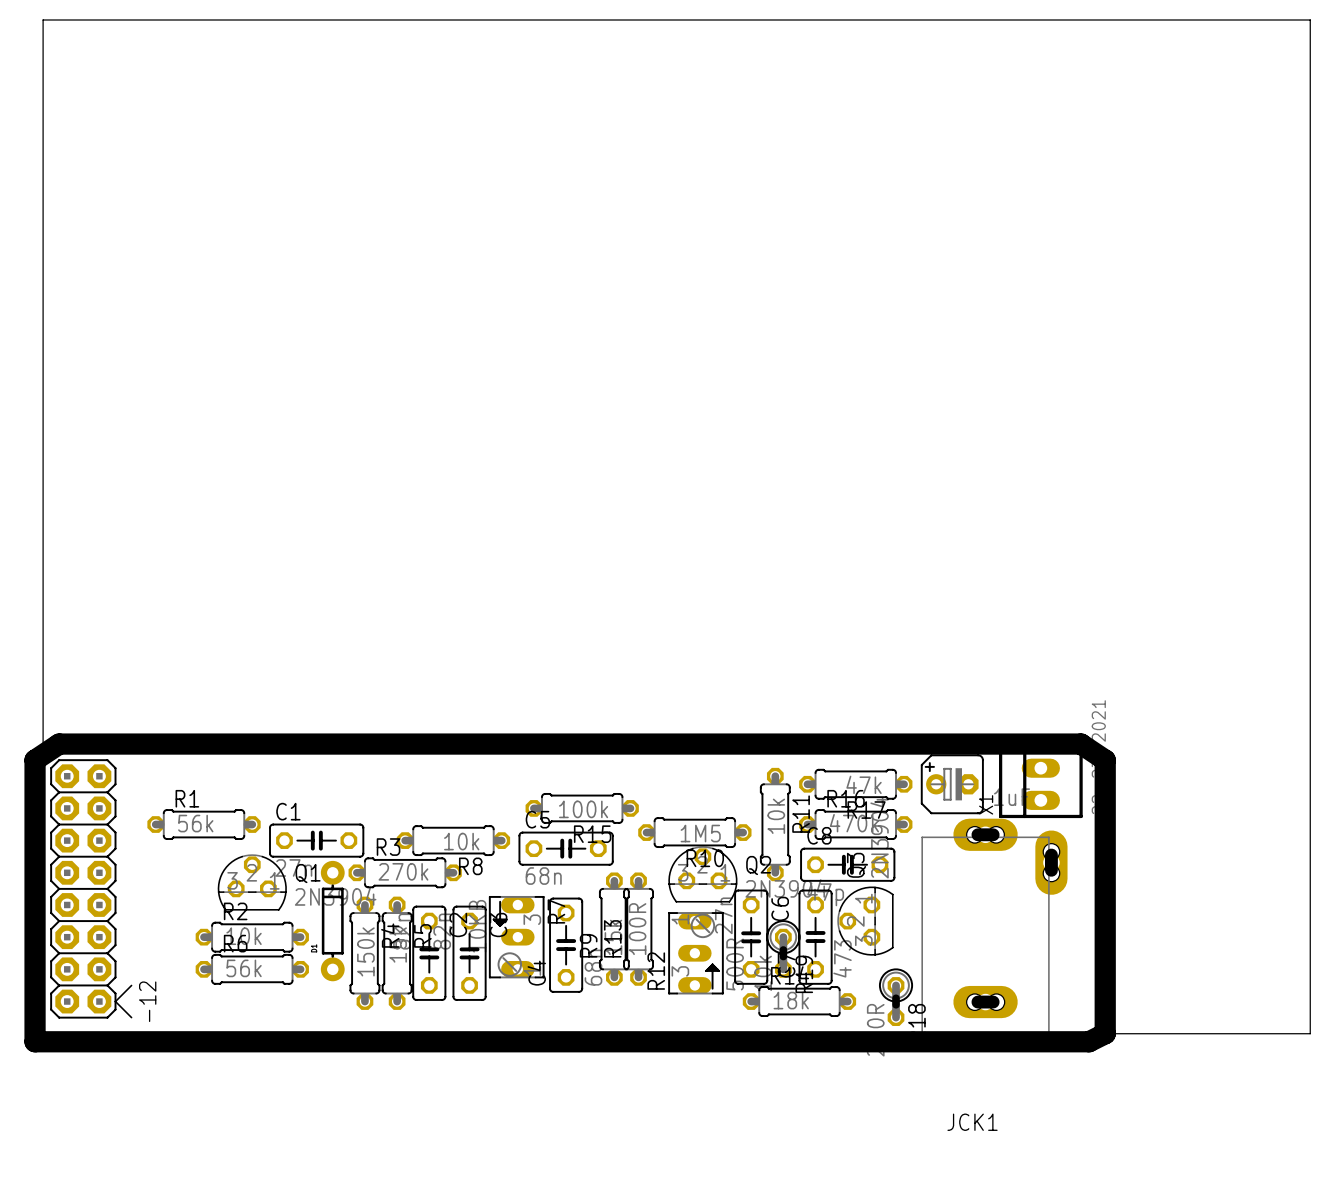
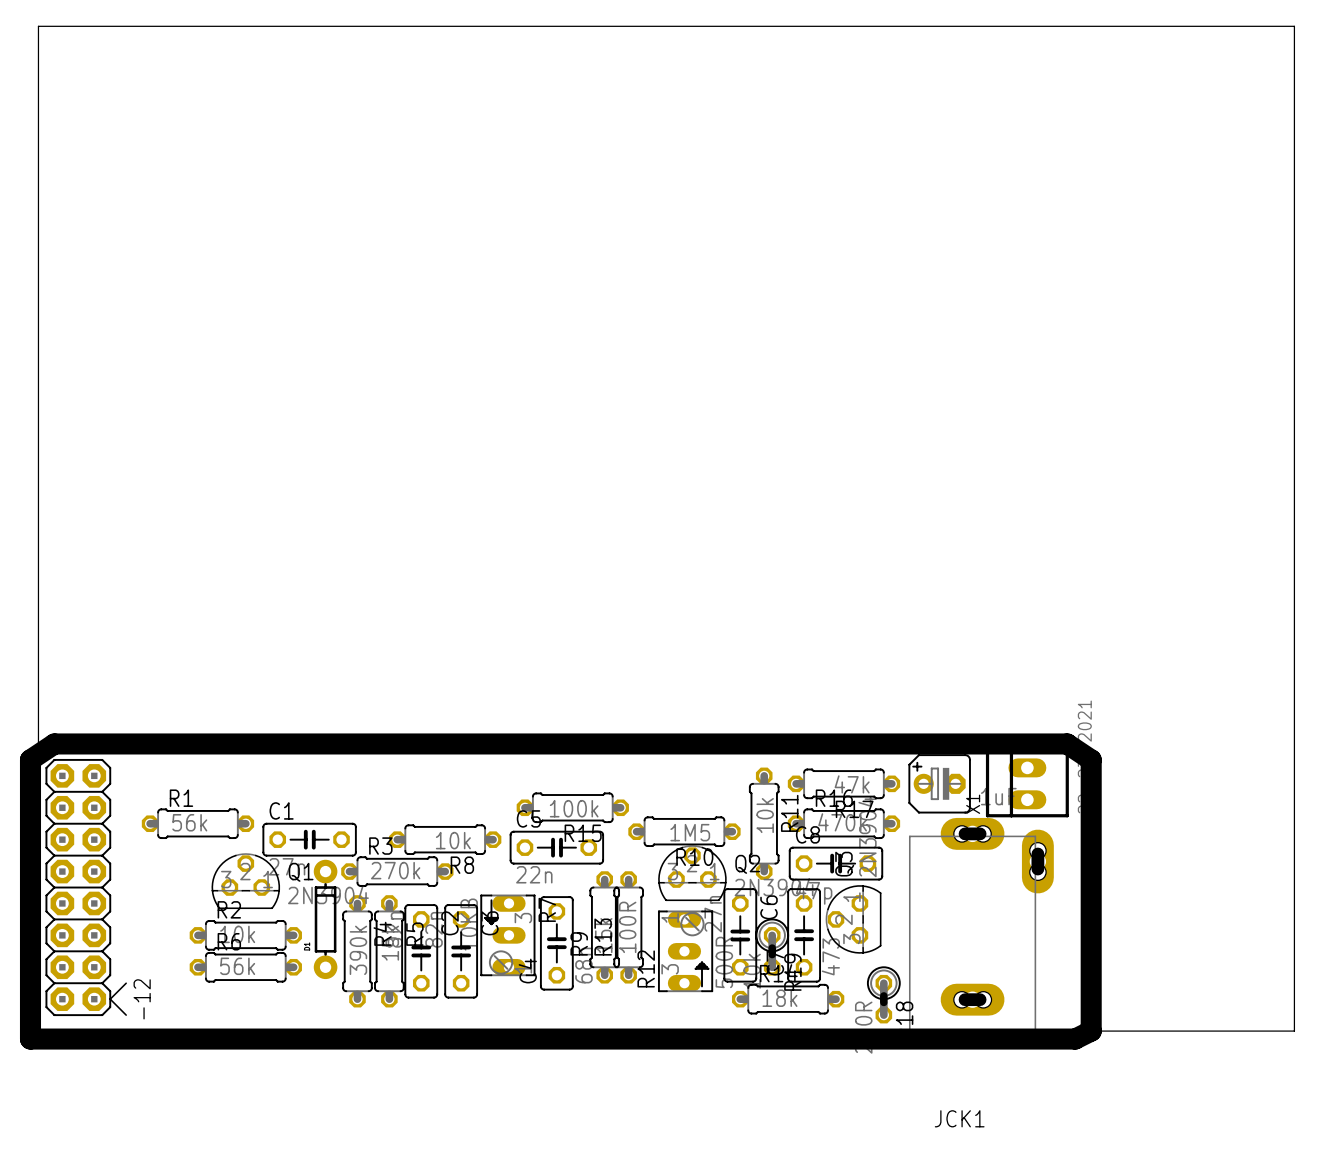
C5 value: 68n (543, 876) -> 22n (534, 874)
R4 value: 150k (365, 951) -> 390k (358, 950)

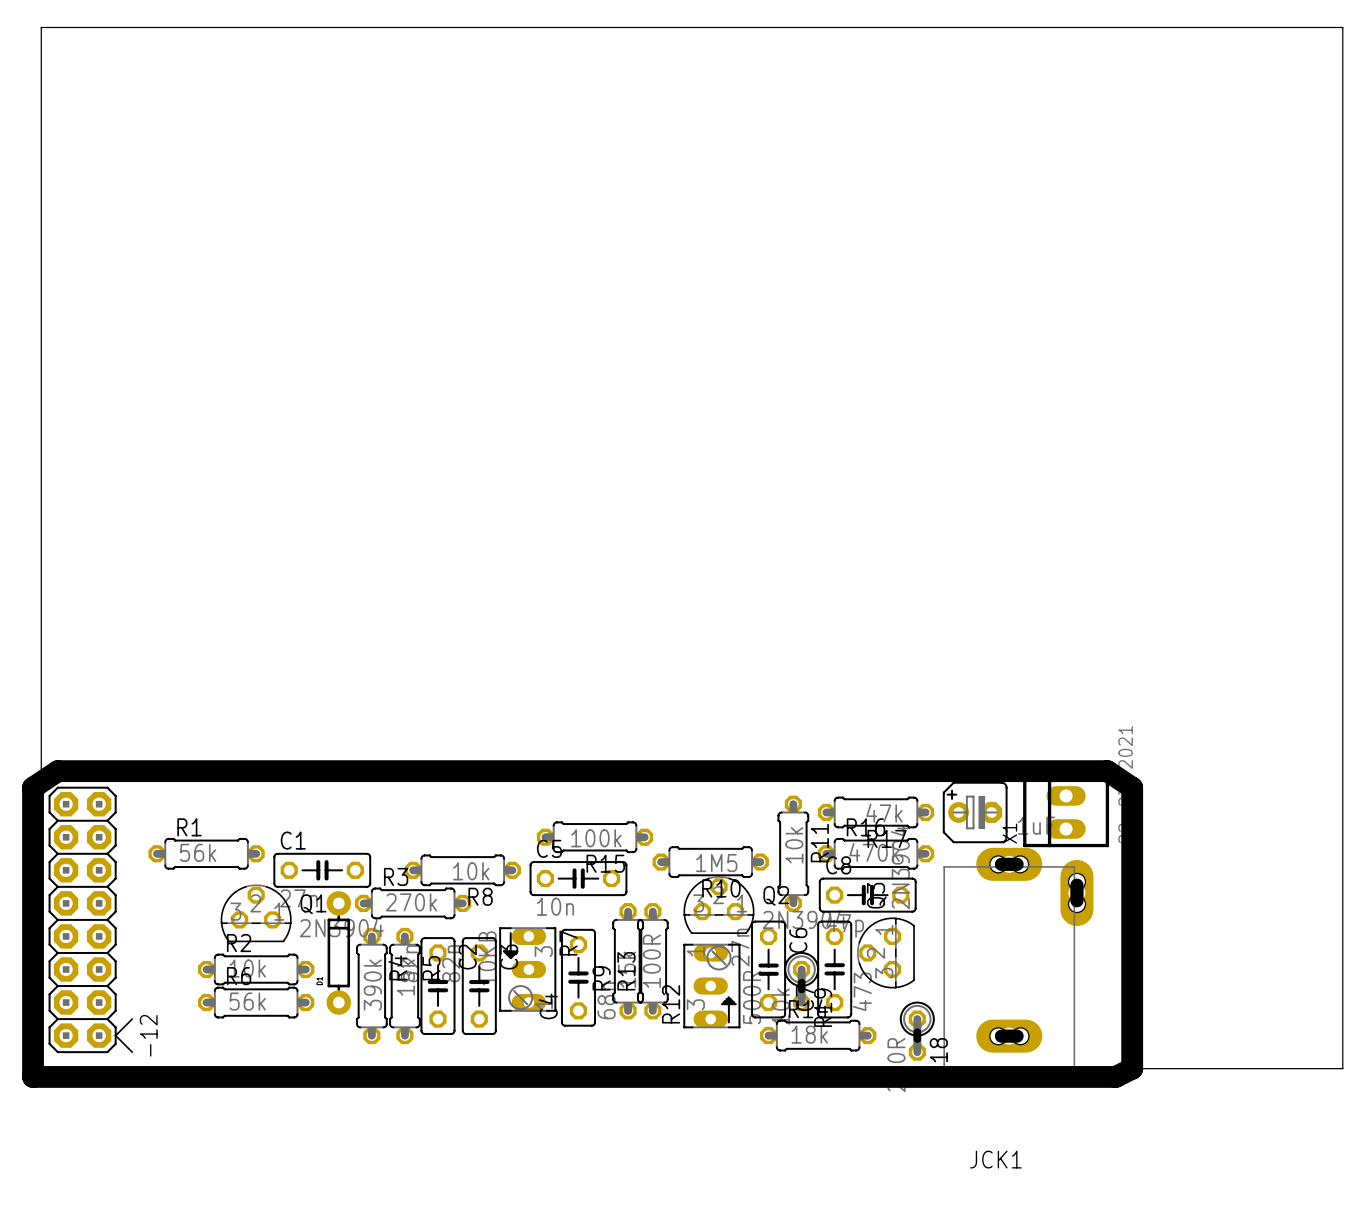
C5 value: 22n (534, 874) -> 10n (555, 906)

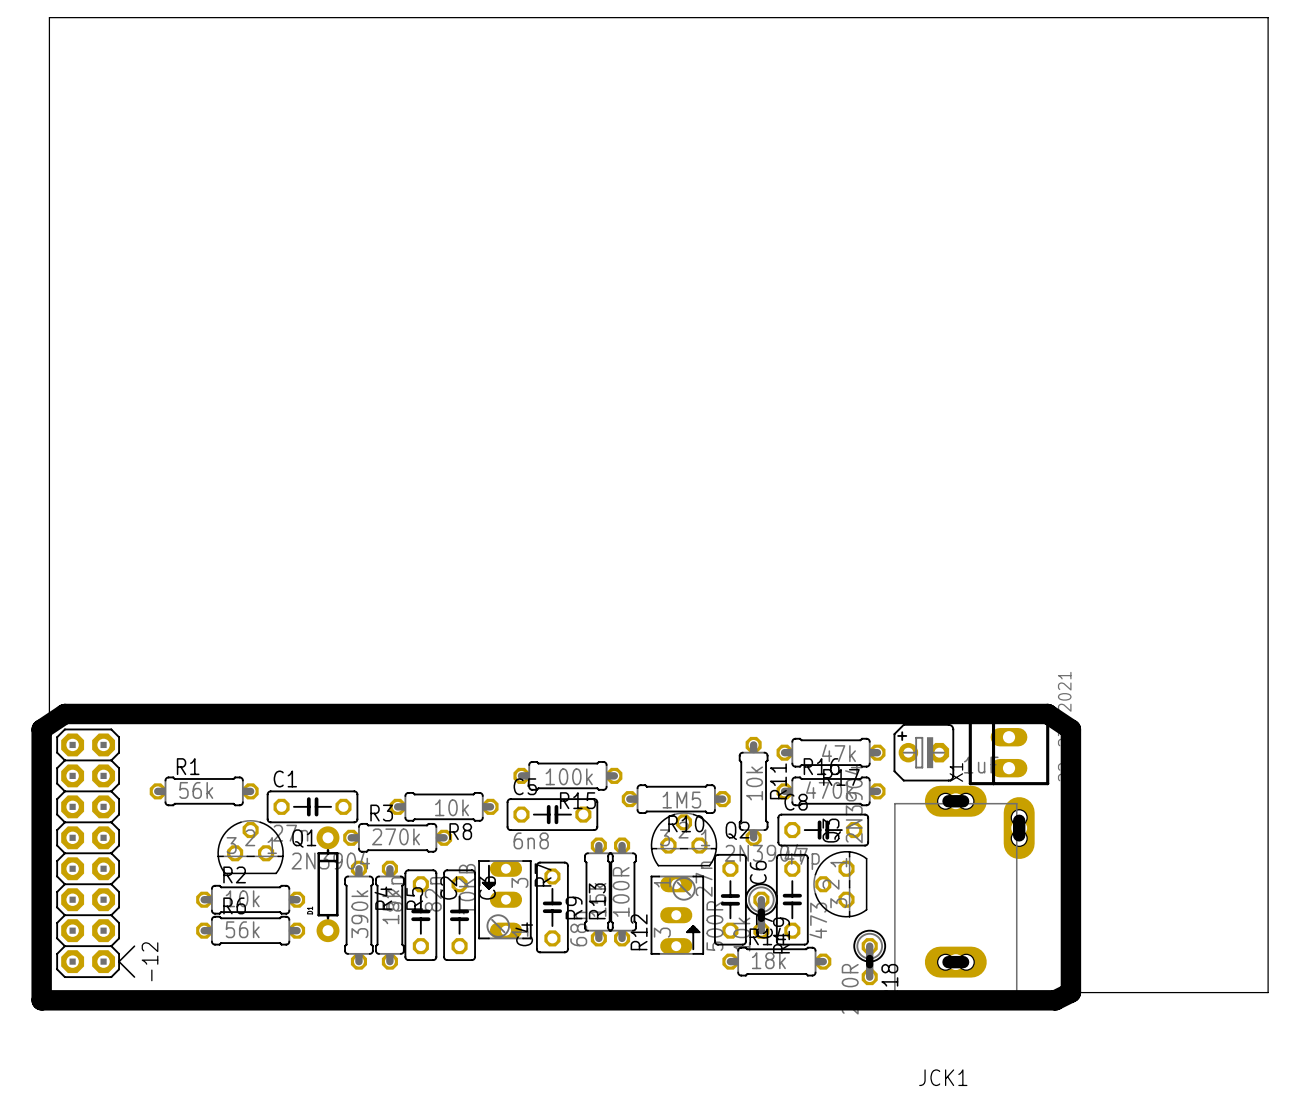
C5 value: 10n (555, 906) -> 6n8 (531, 840)

